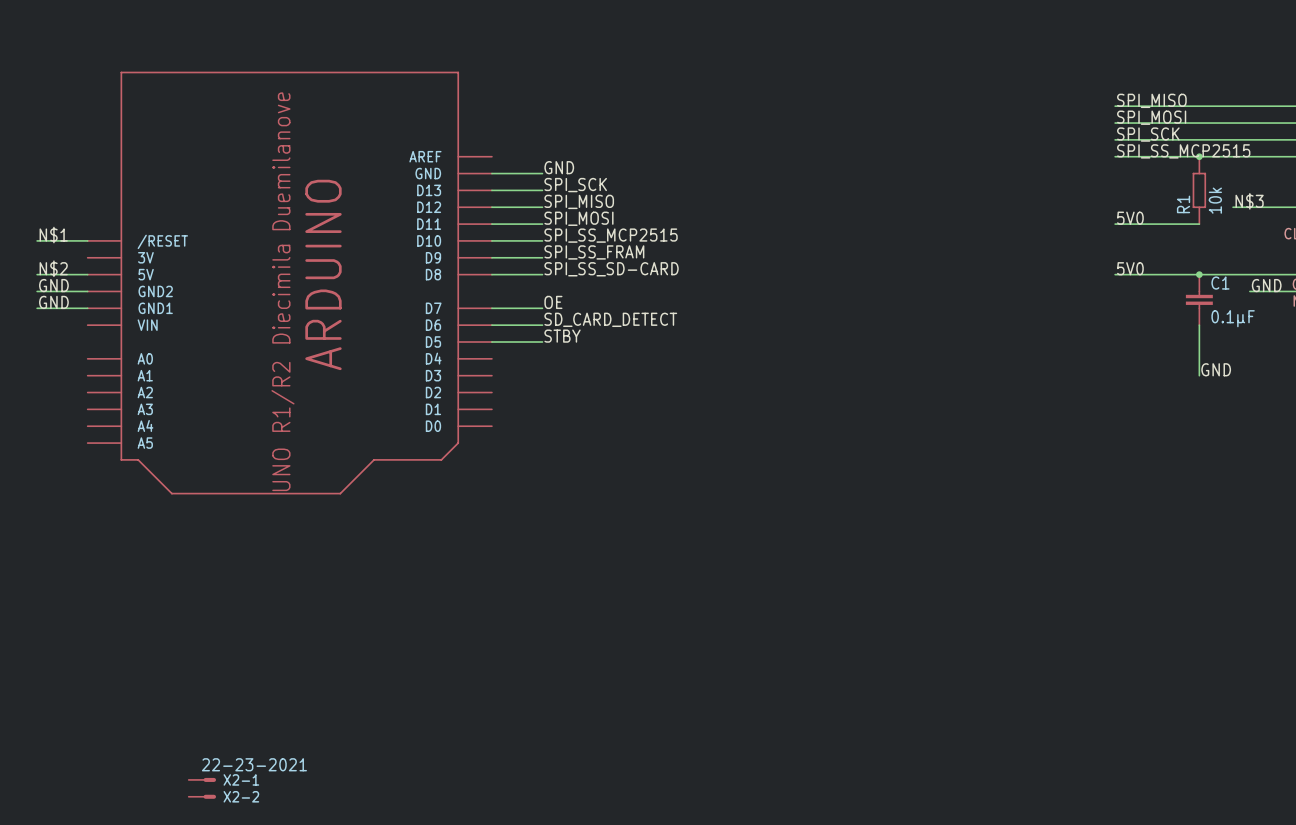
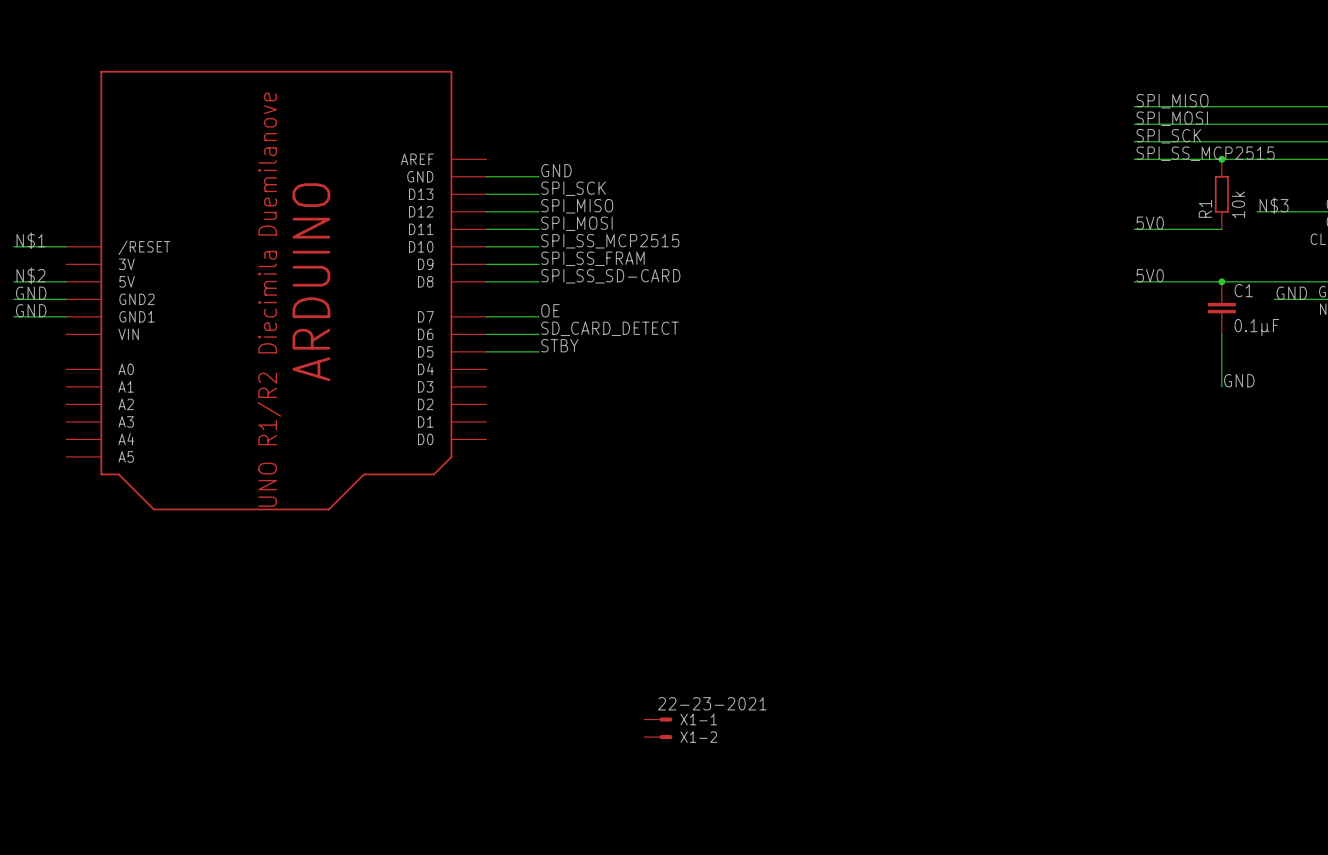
X1-1: none -> 22-23-2021 (658, 719)
X1-2: none -> (658, 737)
X2-1: 22-23-2021 (202, 779) -> none
X2-2: (202, 796) -> none

